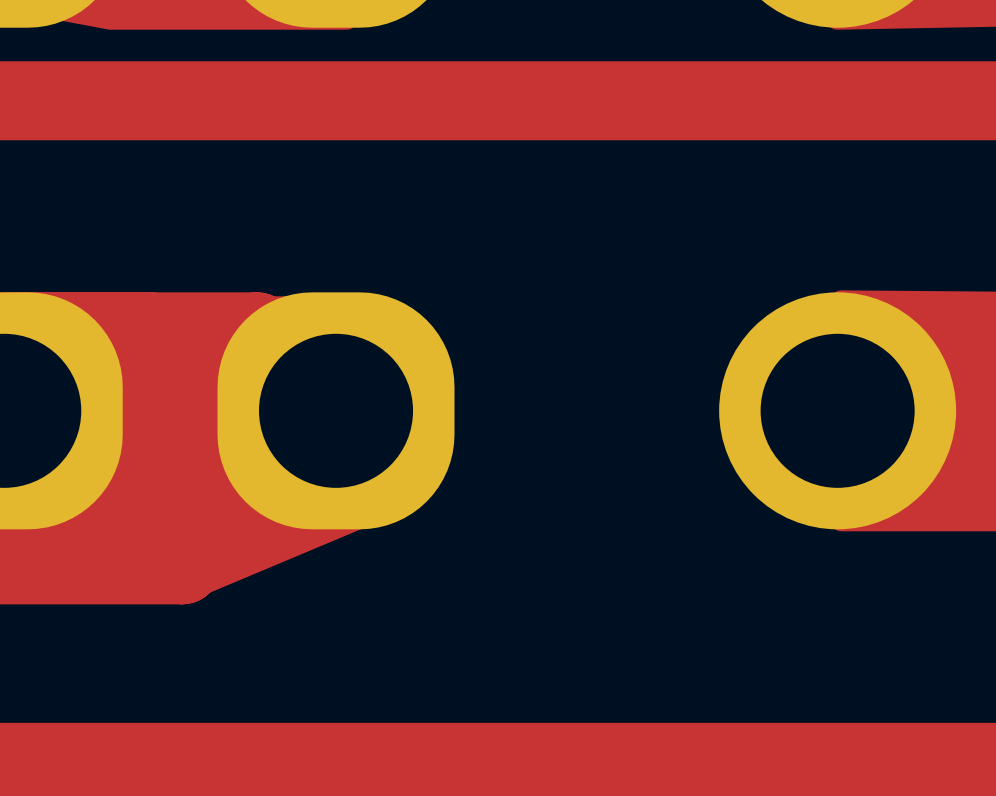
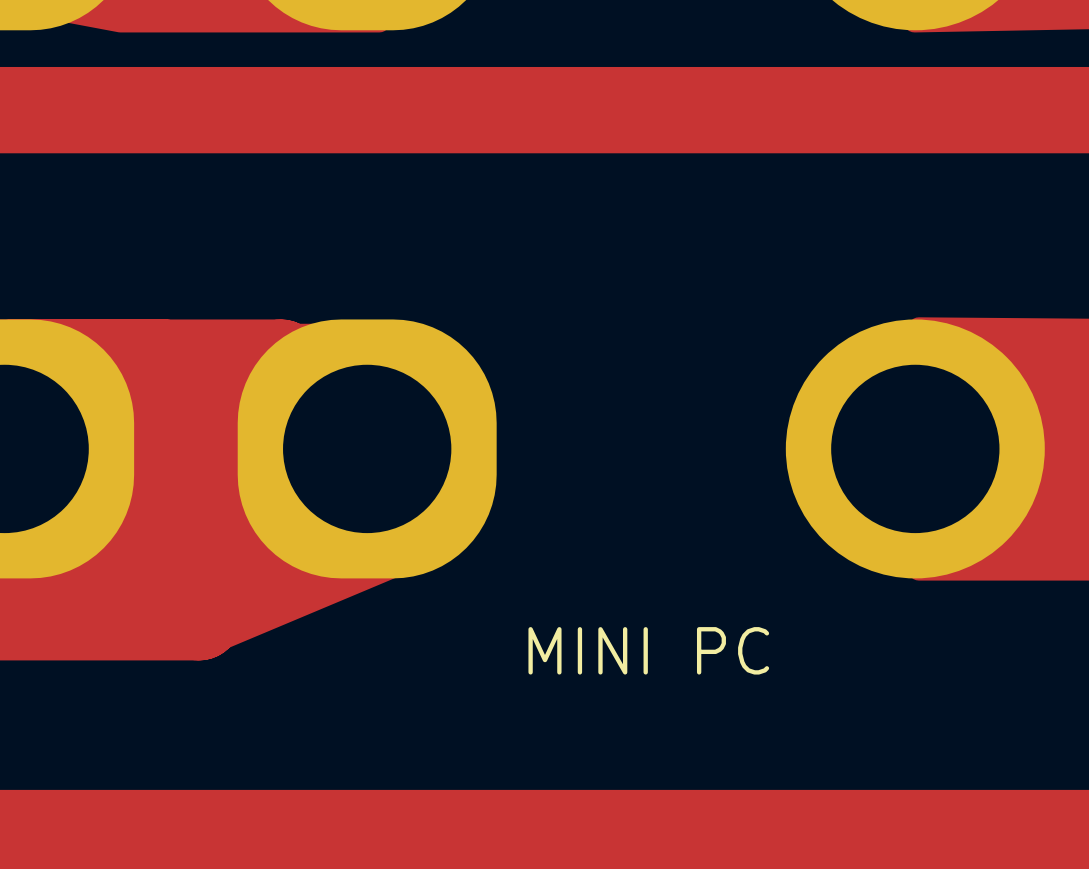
text: none -> MINI PC (648, 650)

